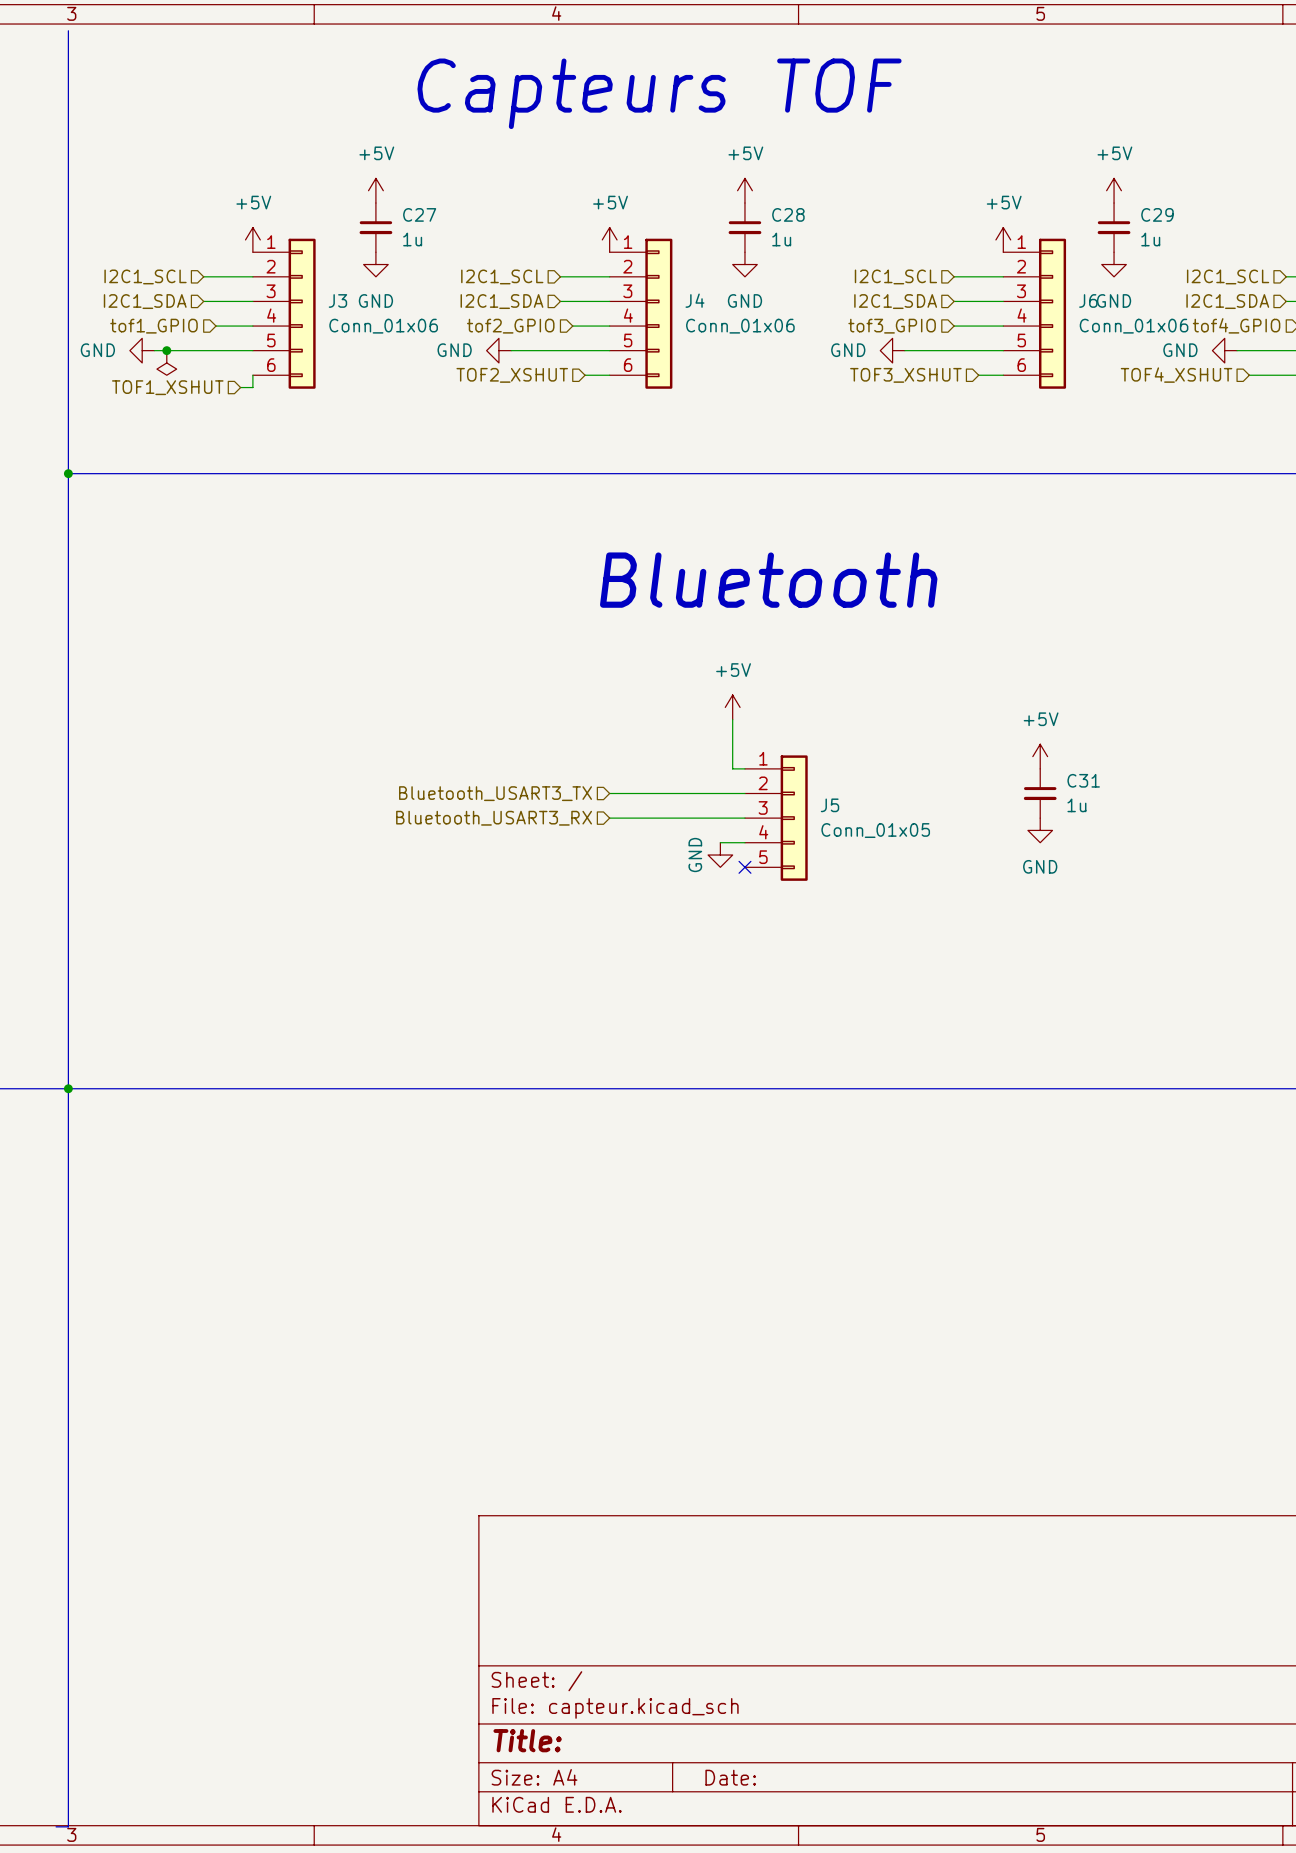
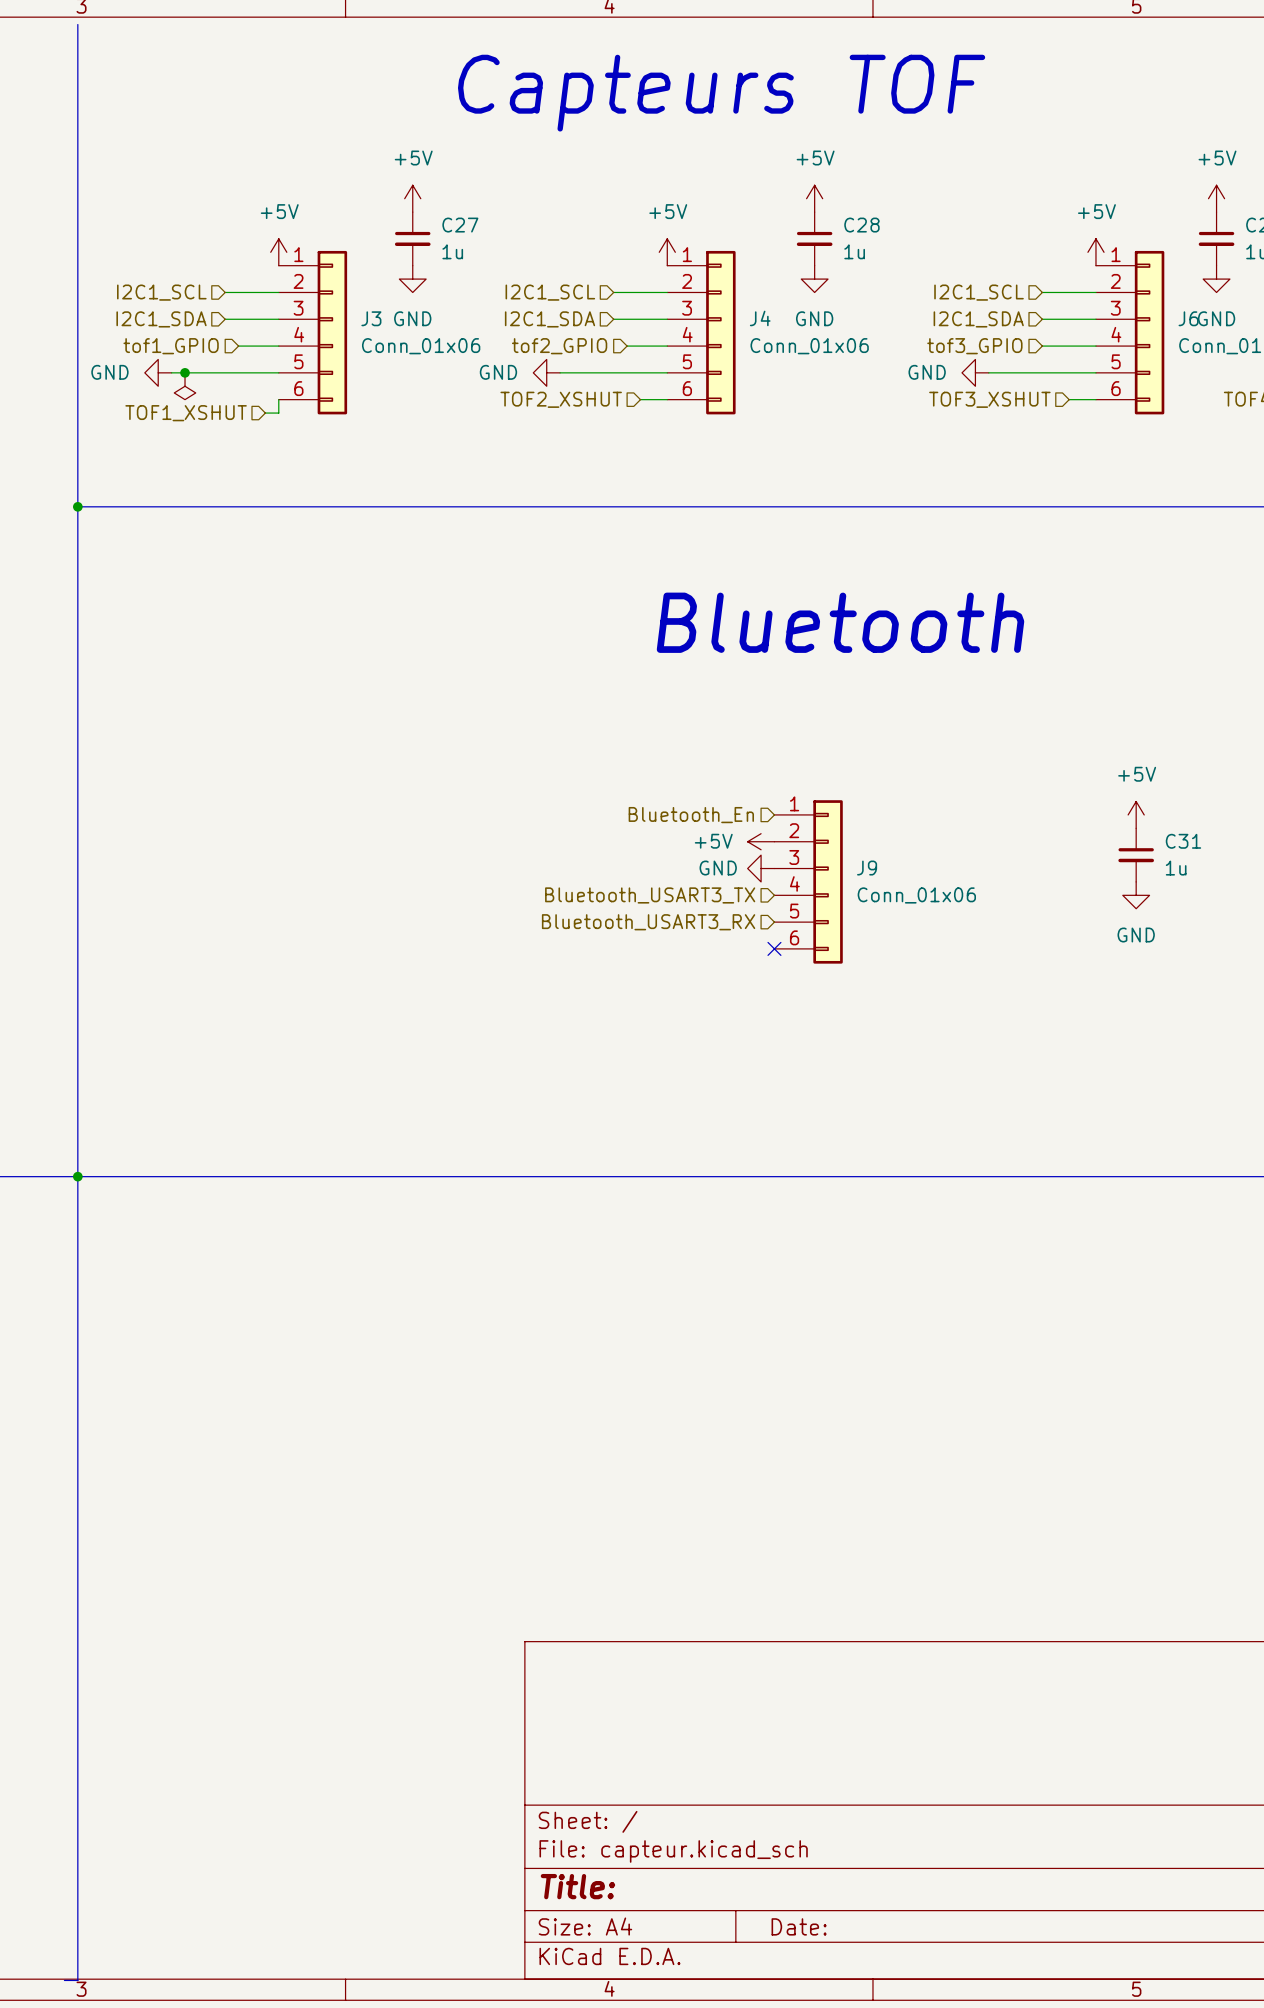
power symbol rotation: 0° (732, 707) -> 90° counterclockwise (761, 841)
power symbol position: +5V (732, 707) -> +5V (761, 841)
wire: (732, 719) (732, 768) (744, 768) -> none
hierarchical label: none -> Bluetooth_En (691, 815)
hierarchical label position: Bluetooth_USART3_TX (495, 793) -> Bluetooth_USART3_TX (650, 895)
wire: (609, 793) (744, 793) -> none
hierarchical label position: Bluetooth_USART3_RX (494, 818) -> Bluetooth_USART3_RX (648, 922)
wire: (609, 818) (744, 818) -> none
J9: none -> Conn_01x06 (808, 881)
J5: Conn_01x05 (776, 818) -> none
wire: (720, 842) (744, 842) -> none
power symbol rotation: 0° (720, 855) -> 90° clockwise (761, 868)
power symbol position: GND (720, 855) -> GND (761, 868)
no-connect mark position: (744, 867) -> (774, 948)

